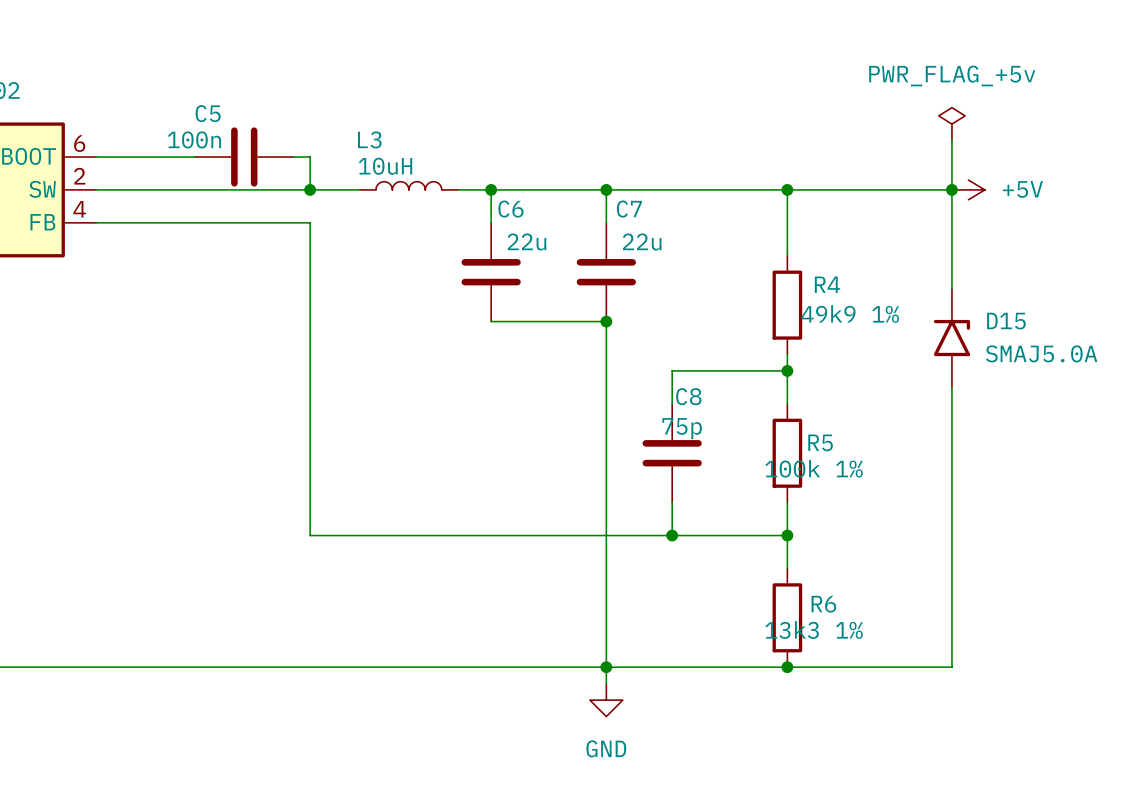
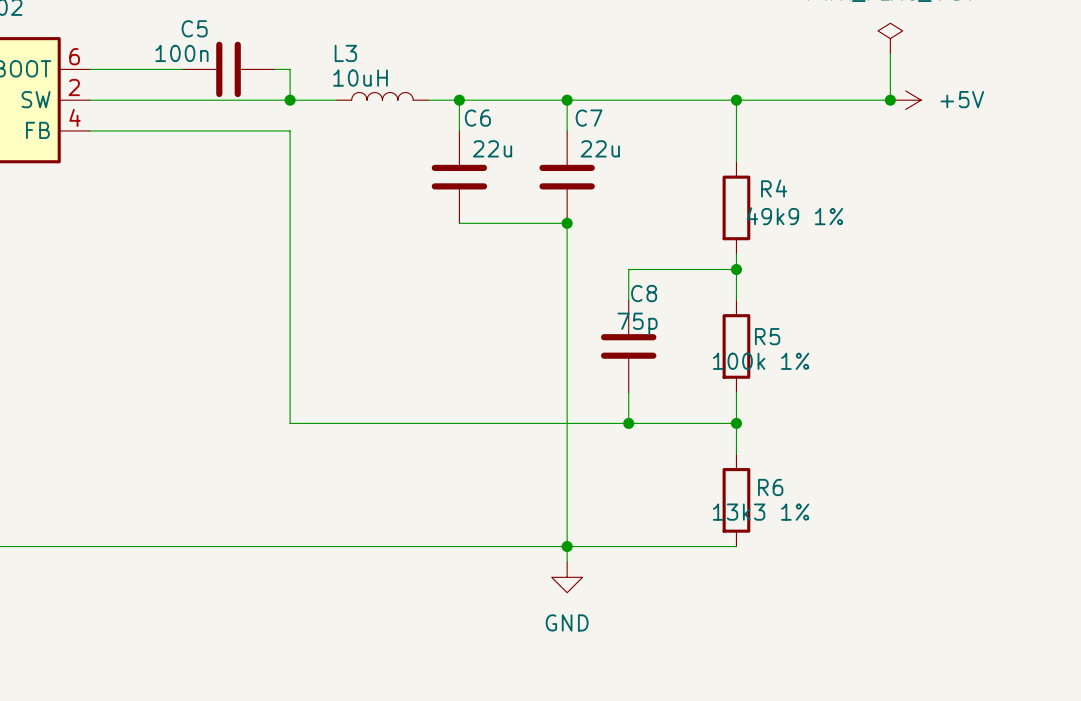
wire: (951, 189) (951, 288) -> none
D15: SMAJ5.0A (951, 338) -> none
wire: (951, 387) (951, 667) (787, 667) -> none
junction: (787, 667) -> none

